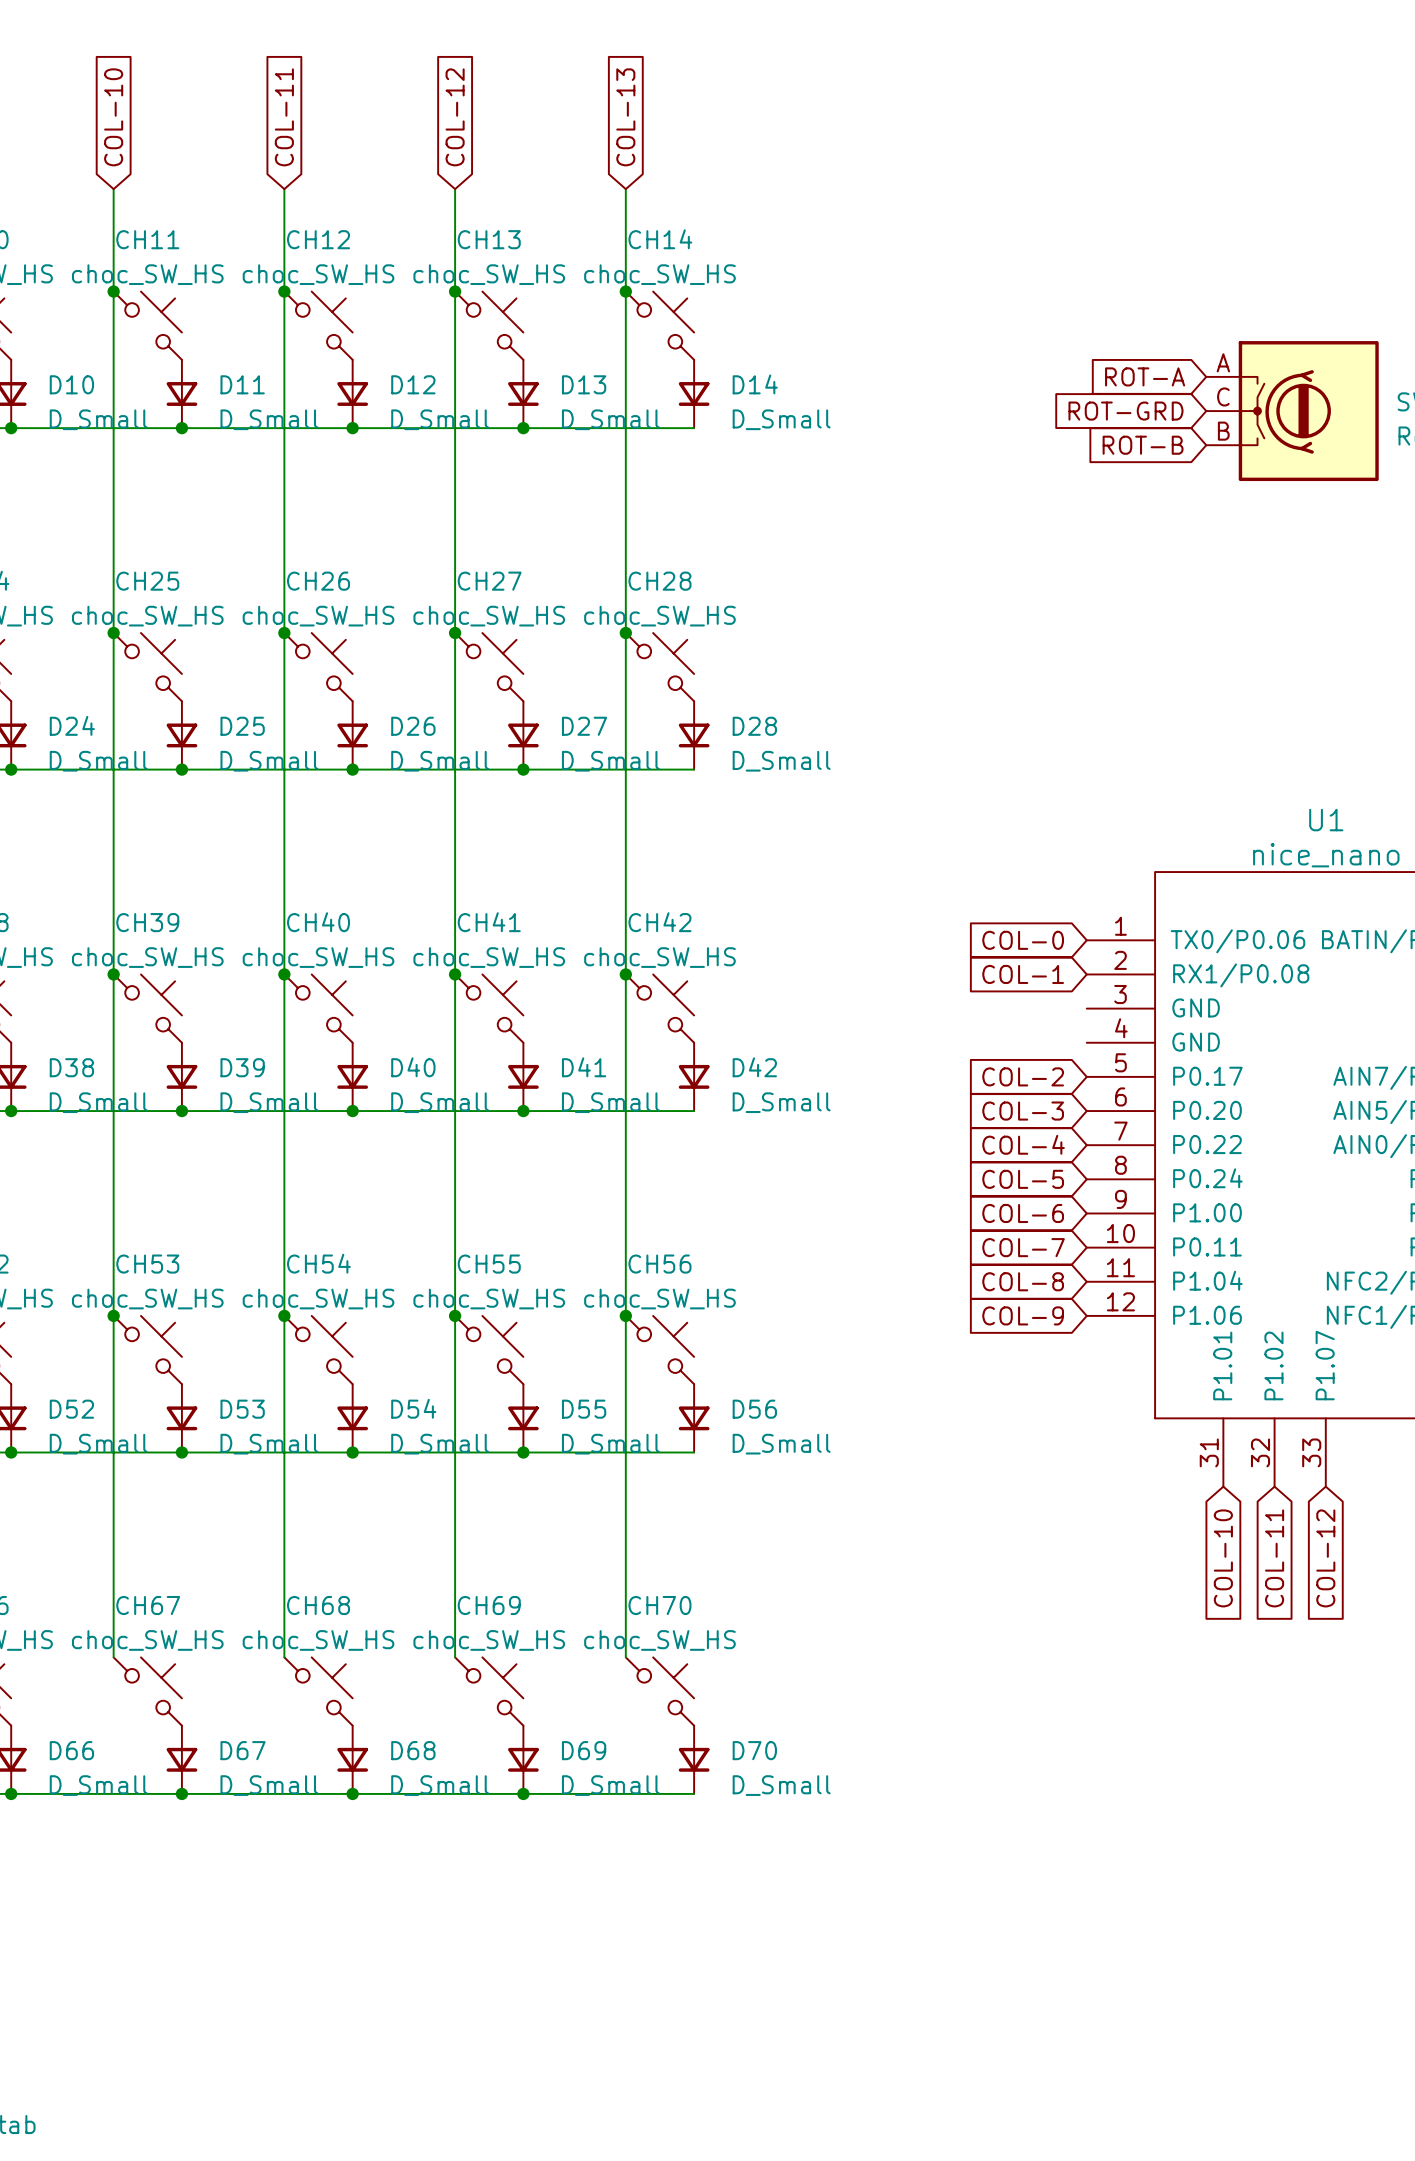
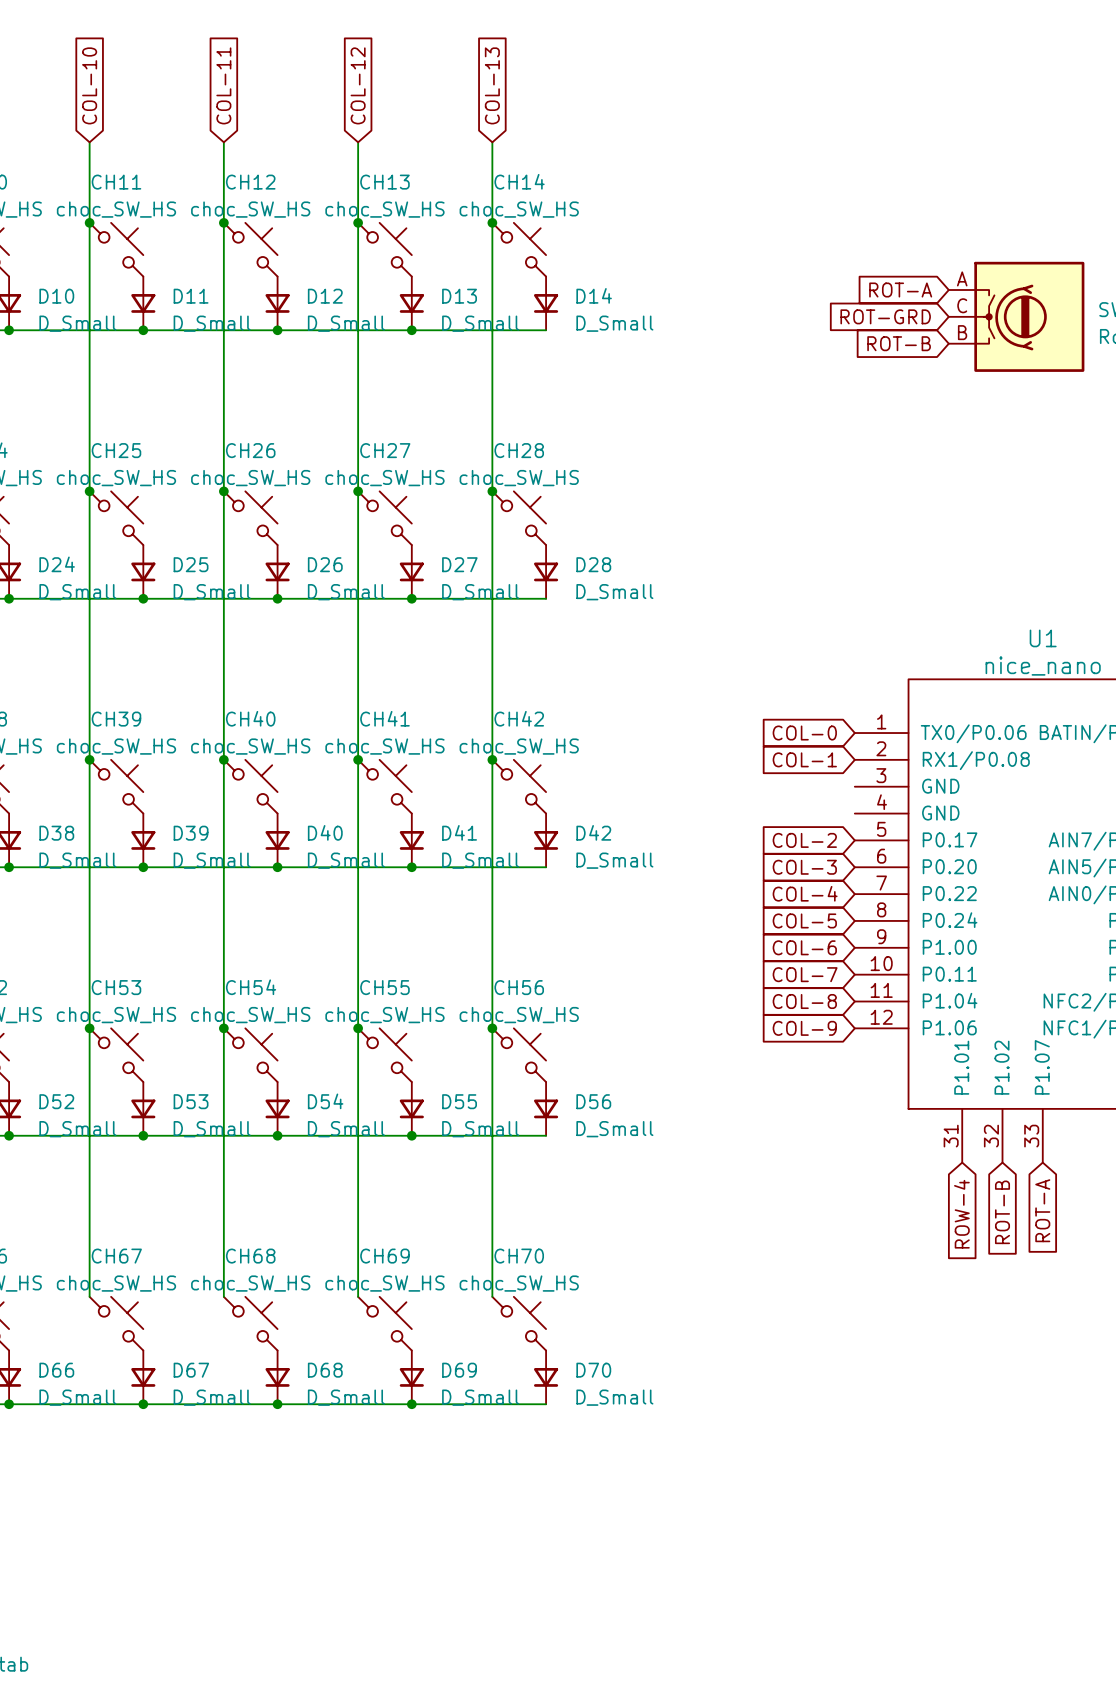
global label: COL-10 (1223, 1558) -> ROW-4 (961, 1214)
global label: COL-11 (1274, 1558) -> ROT-B (1002, 1212)
global label: COL-12 (1325, 1558) -> ROT-A (1042, 1210)

